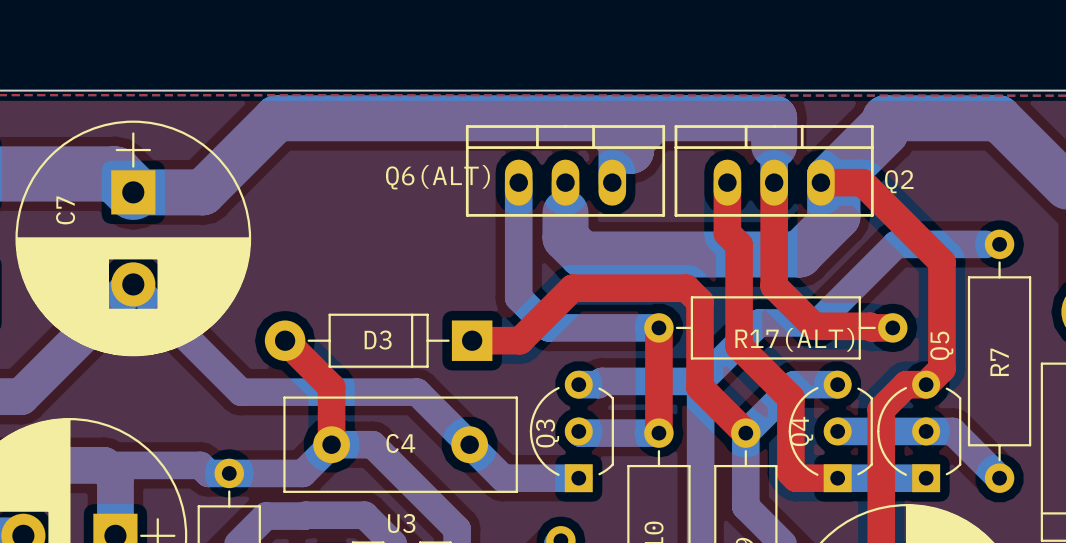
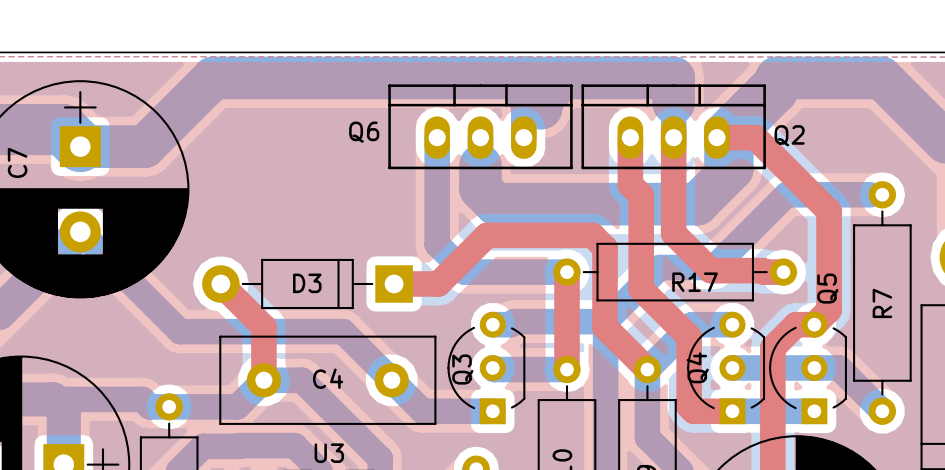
Q6(ALT) name: Q6(ALT) (437, 177) -> Q6 (364, 132)
R17(ALT) name: R17(ALT) (794, 339) -> R17 (695, 282)

